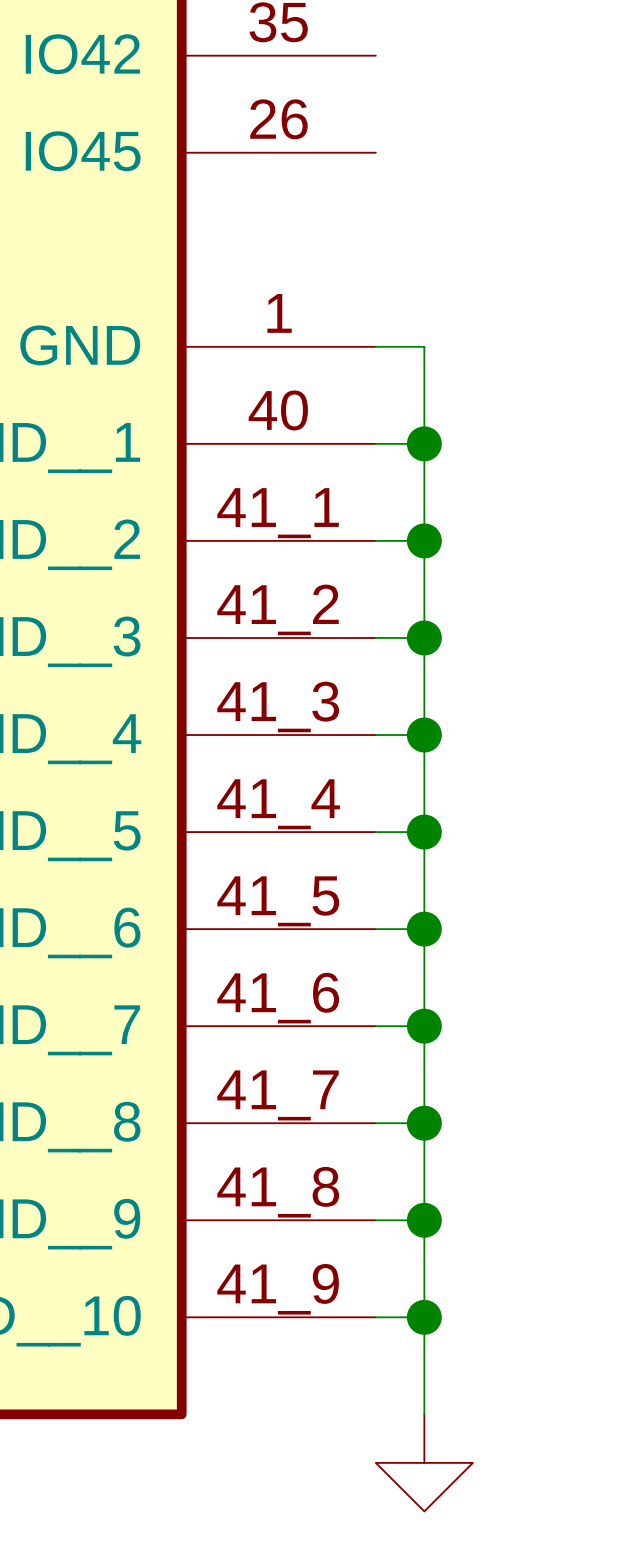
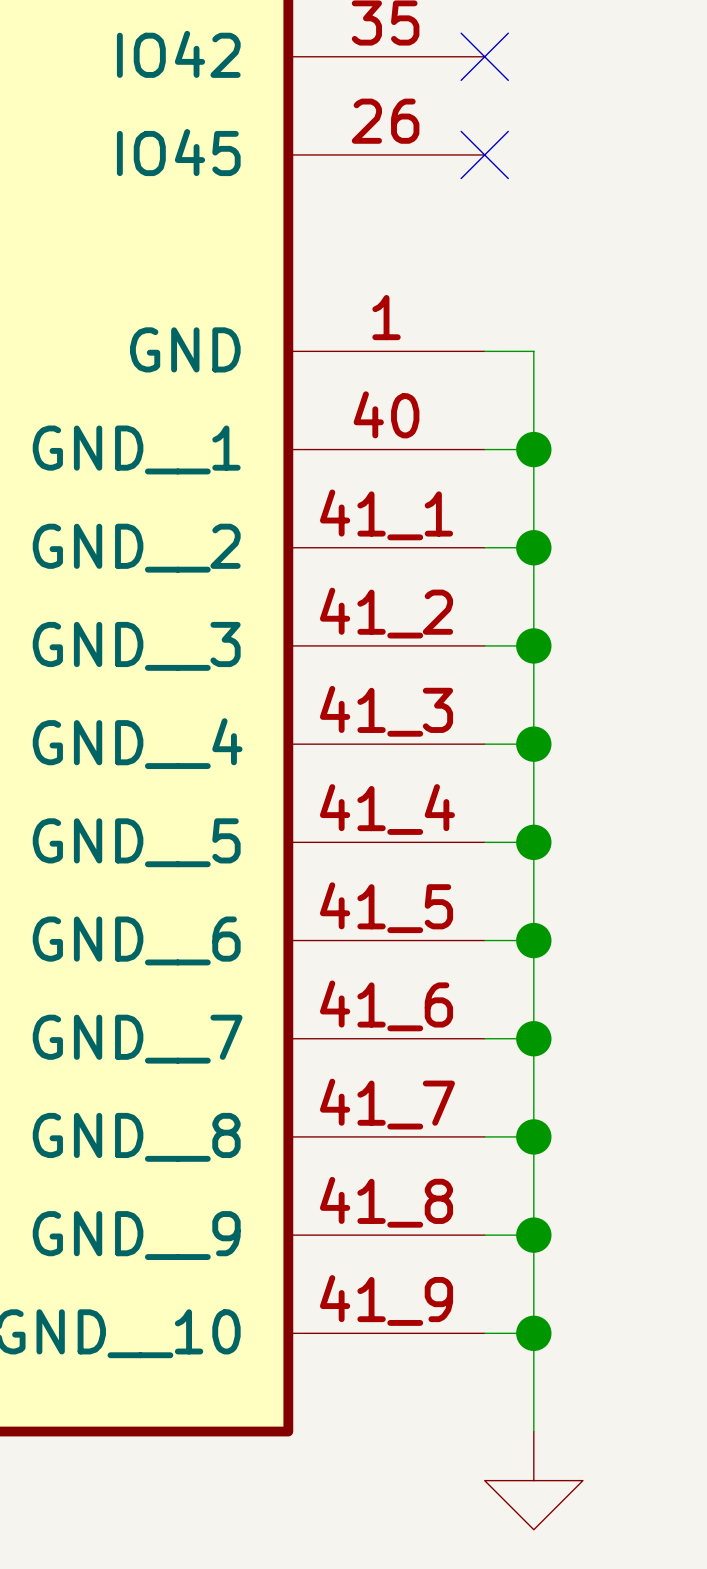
no-connect mark: none -> (484, 56)
no-connect mark: none -> (484, 154)

